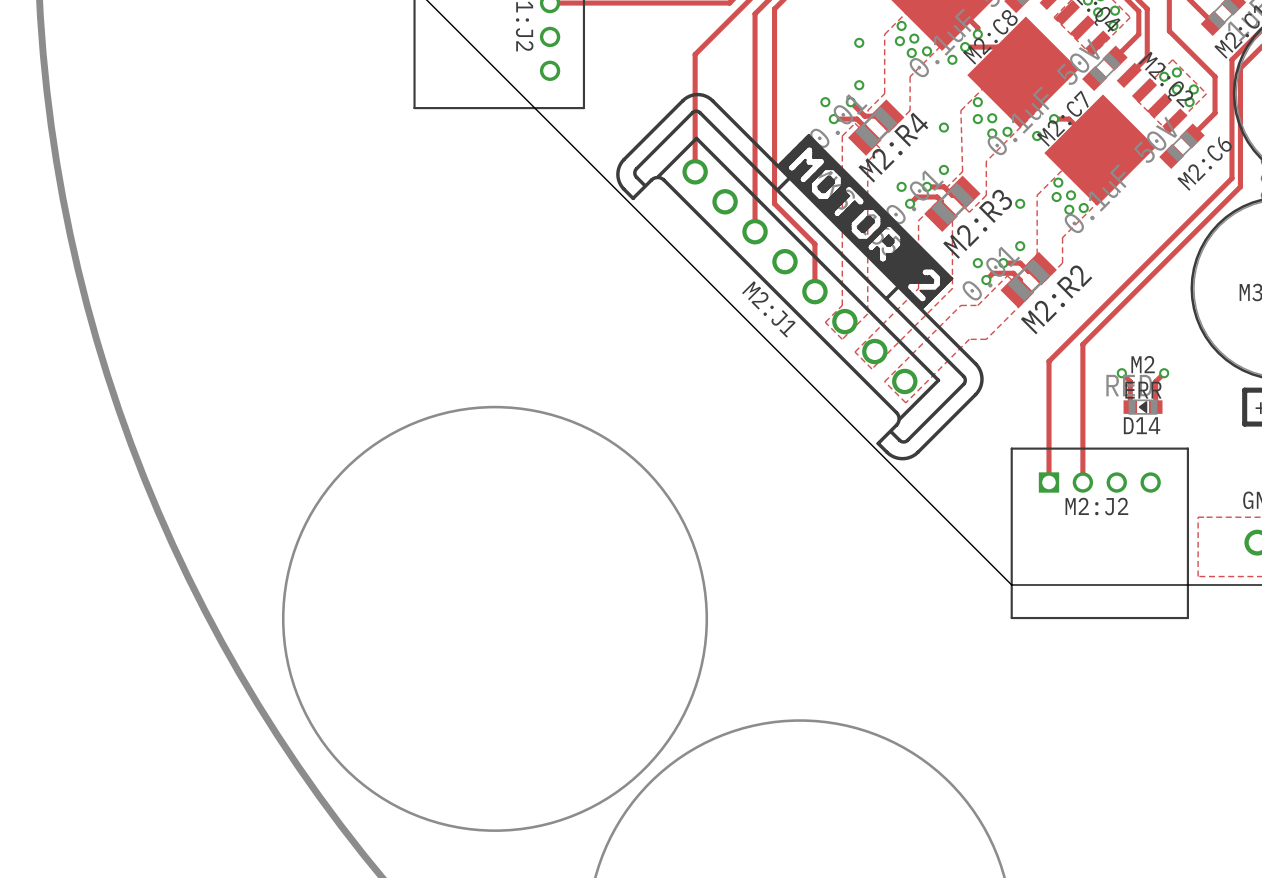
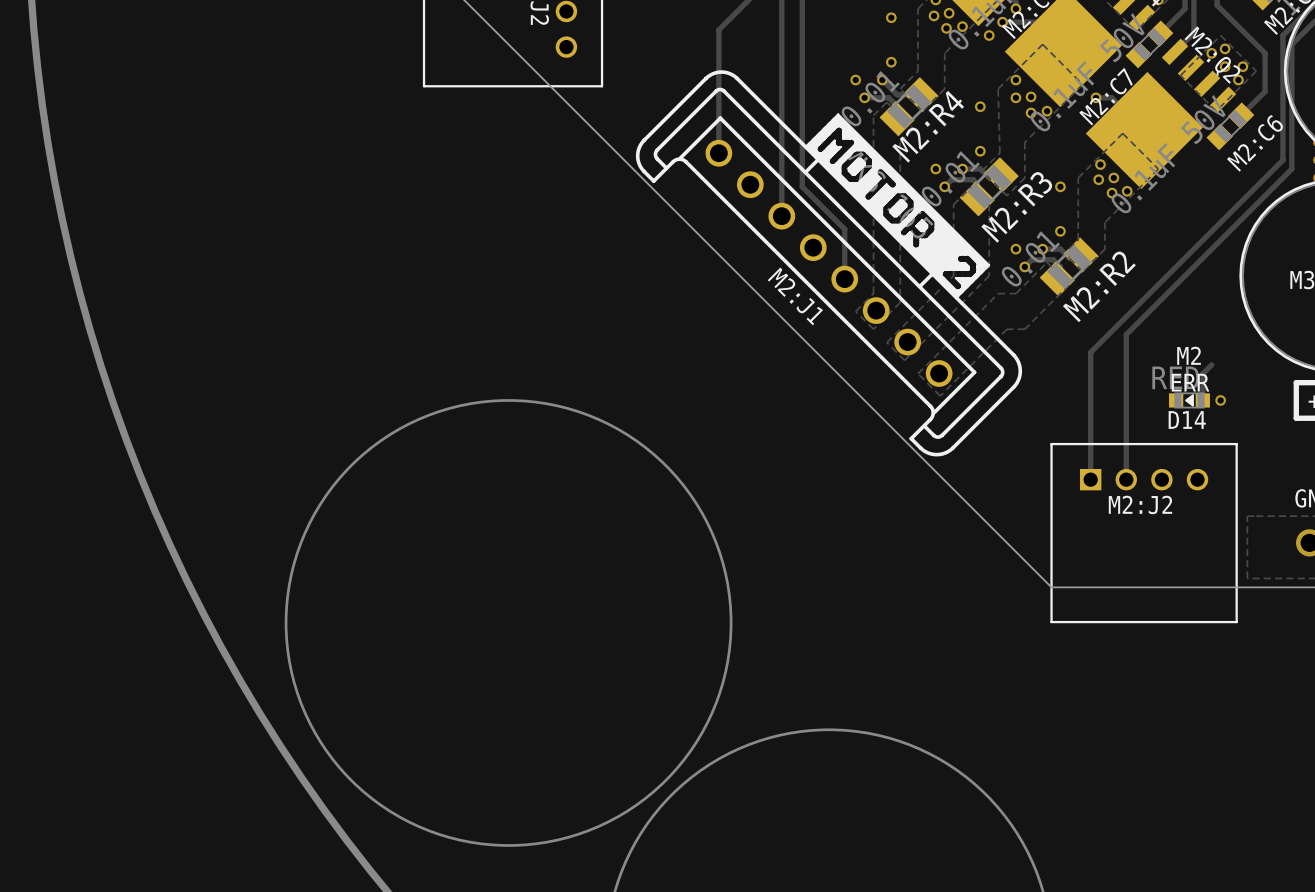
via: (1037, 136) -> none
track: (1121, 373) (1130, 381) (1130, 407) -> none
via: (1121, 373) -> none
via: (1164, 373) -> none
via: none -> (1220, 400)

